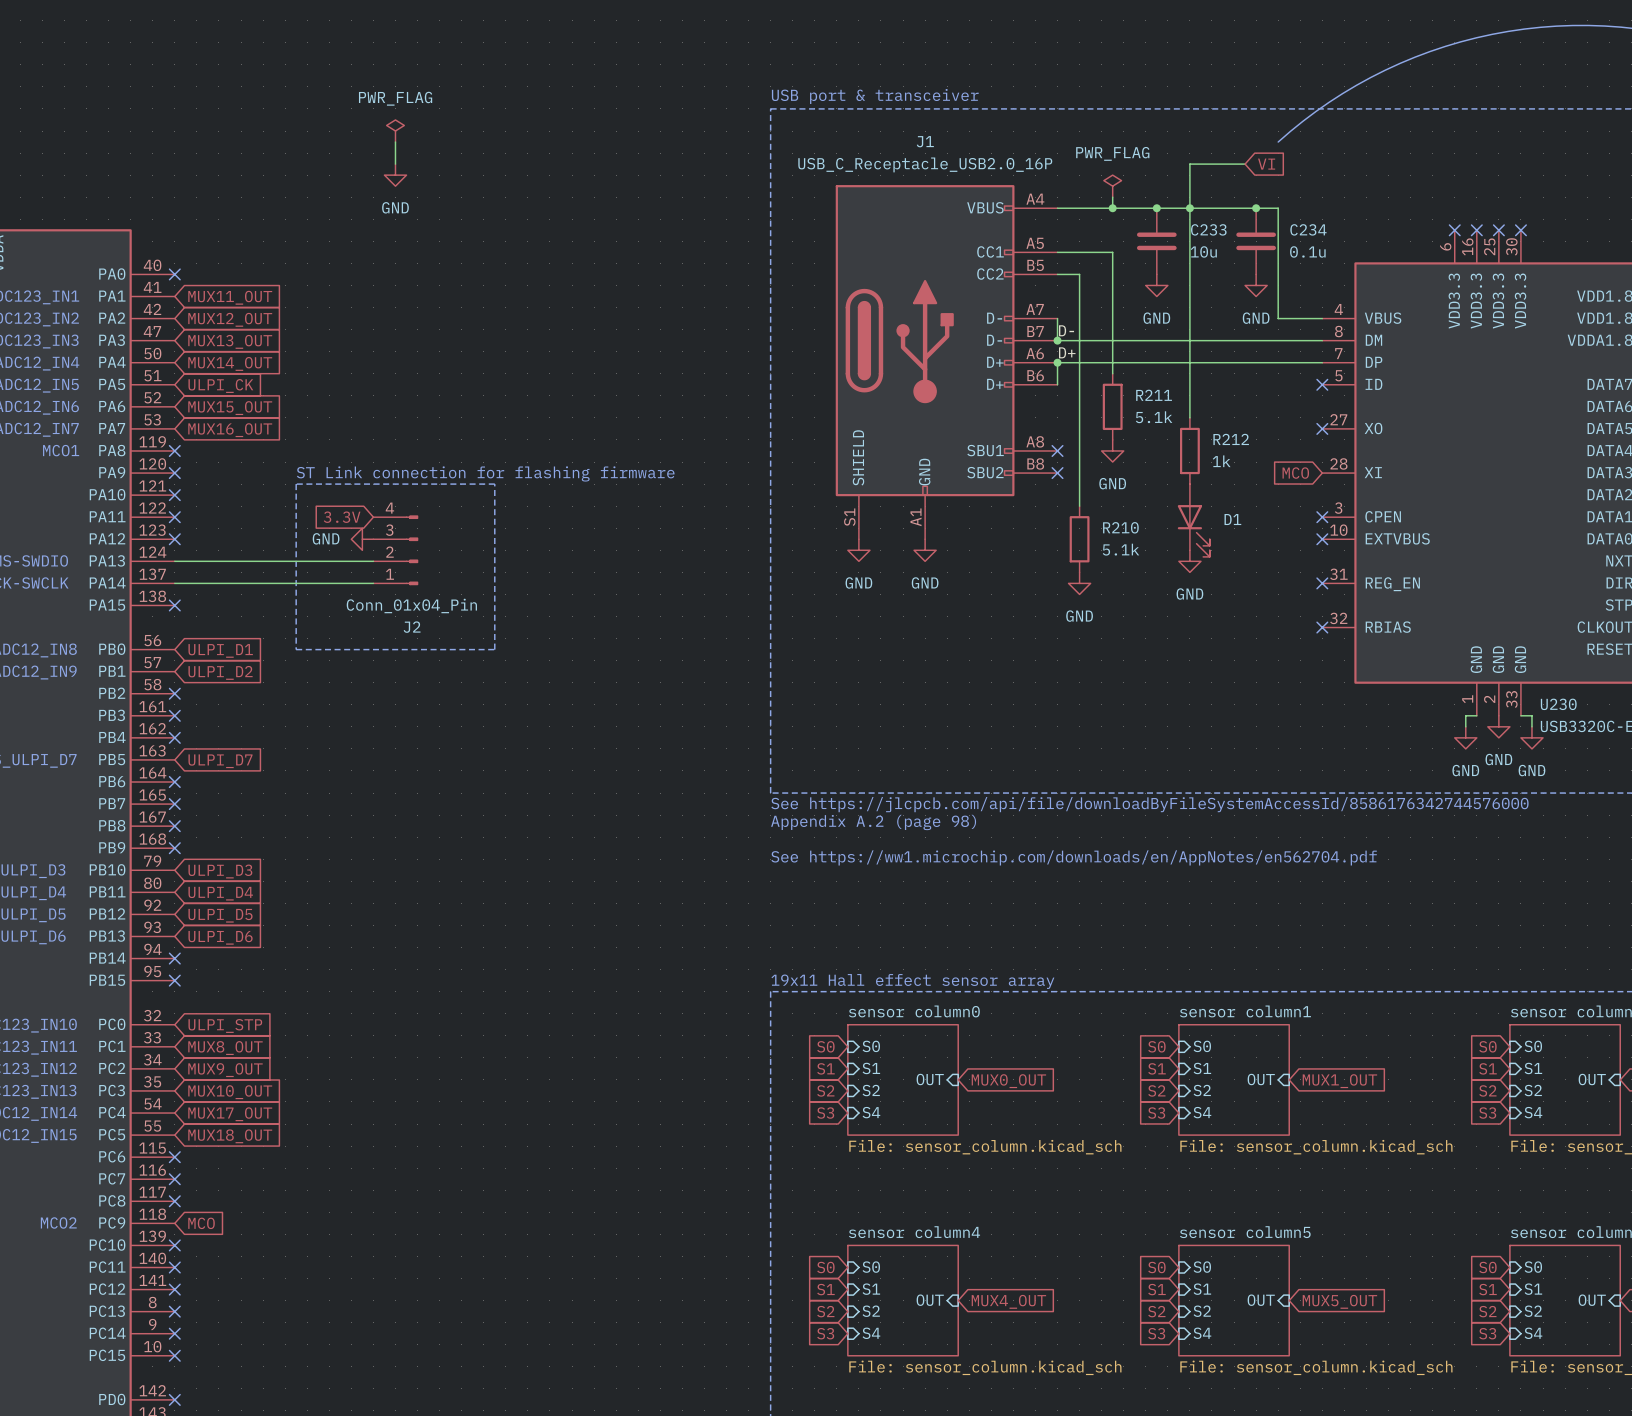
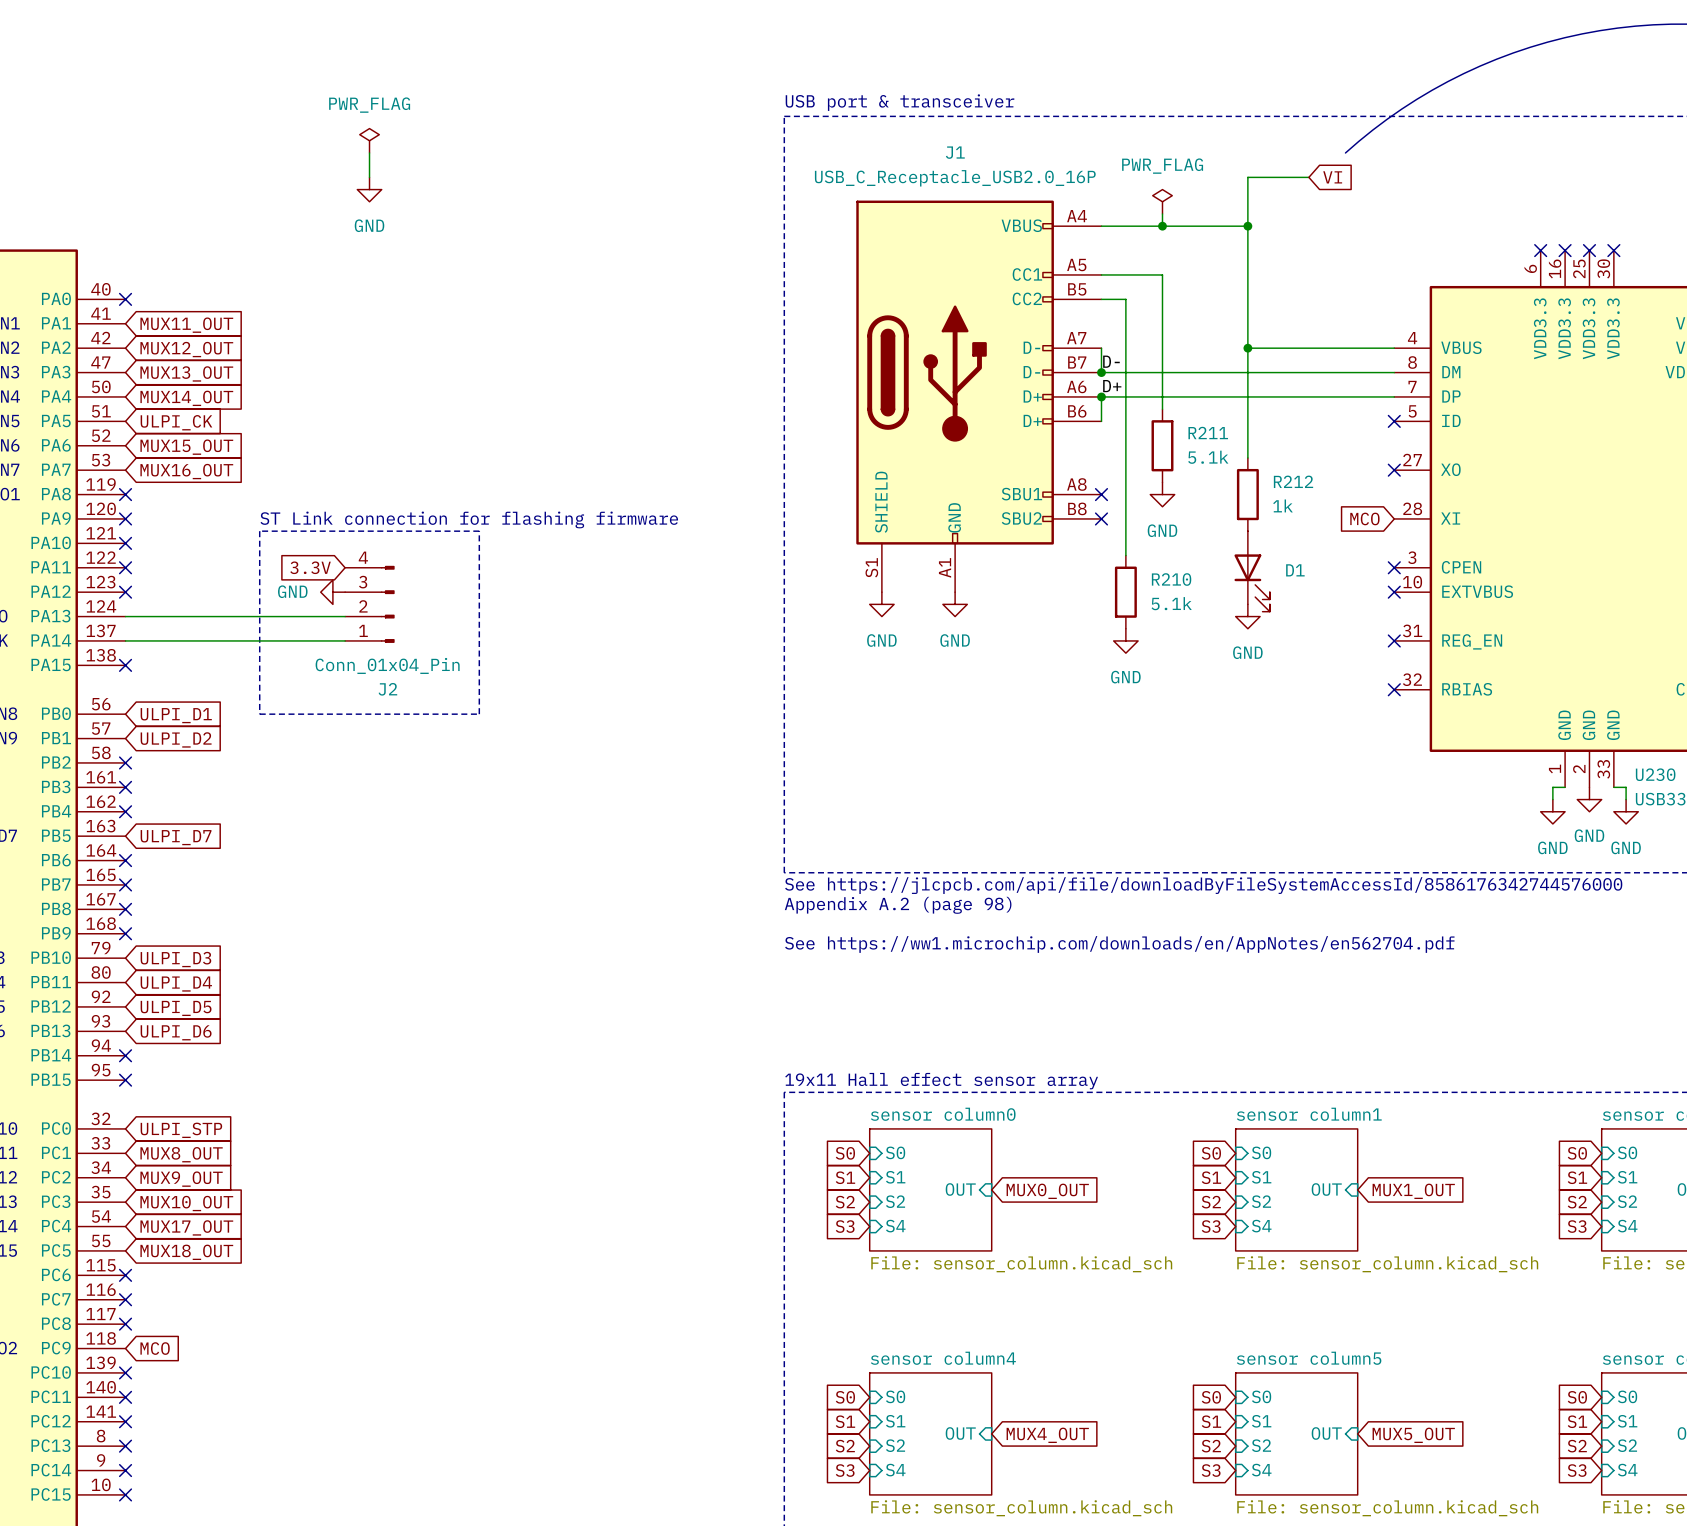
junction: (1156, 208) -> none
wire: (1189, 208) (1278, 208) (1278, 318) -> (1247, 348) (1345, 348)
junction: (1256, 208) -> none
C233: 10u (1156, 241) -> none
C234: 0.1u (1256, 241) -> none
power symbol: GND (1156, 285) -> none
power symbol: GND (1256, 285) -> none
junction: none -> (1247, 348)

